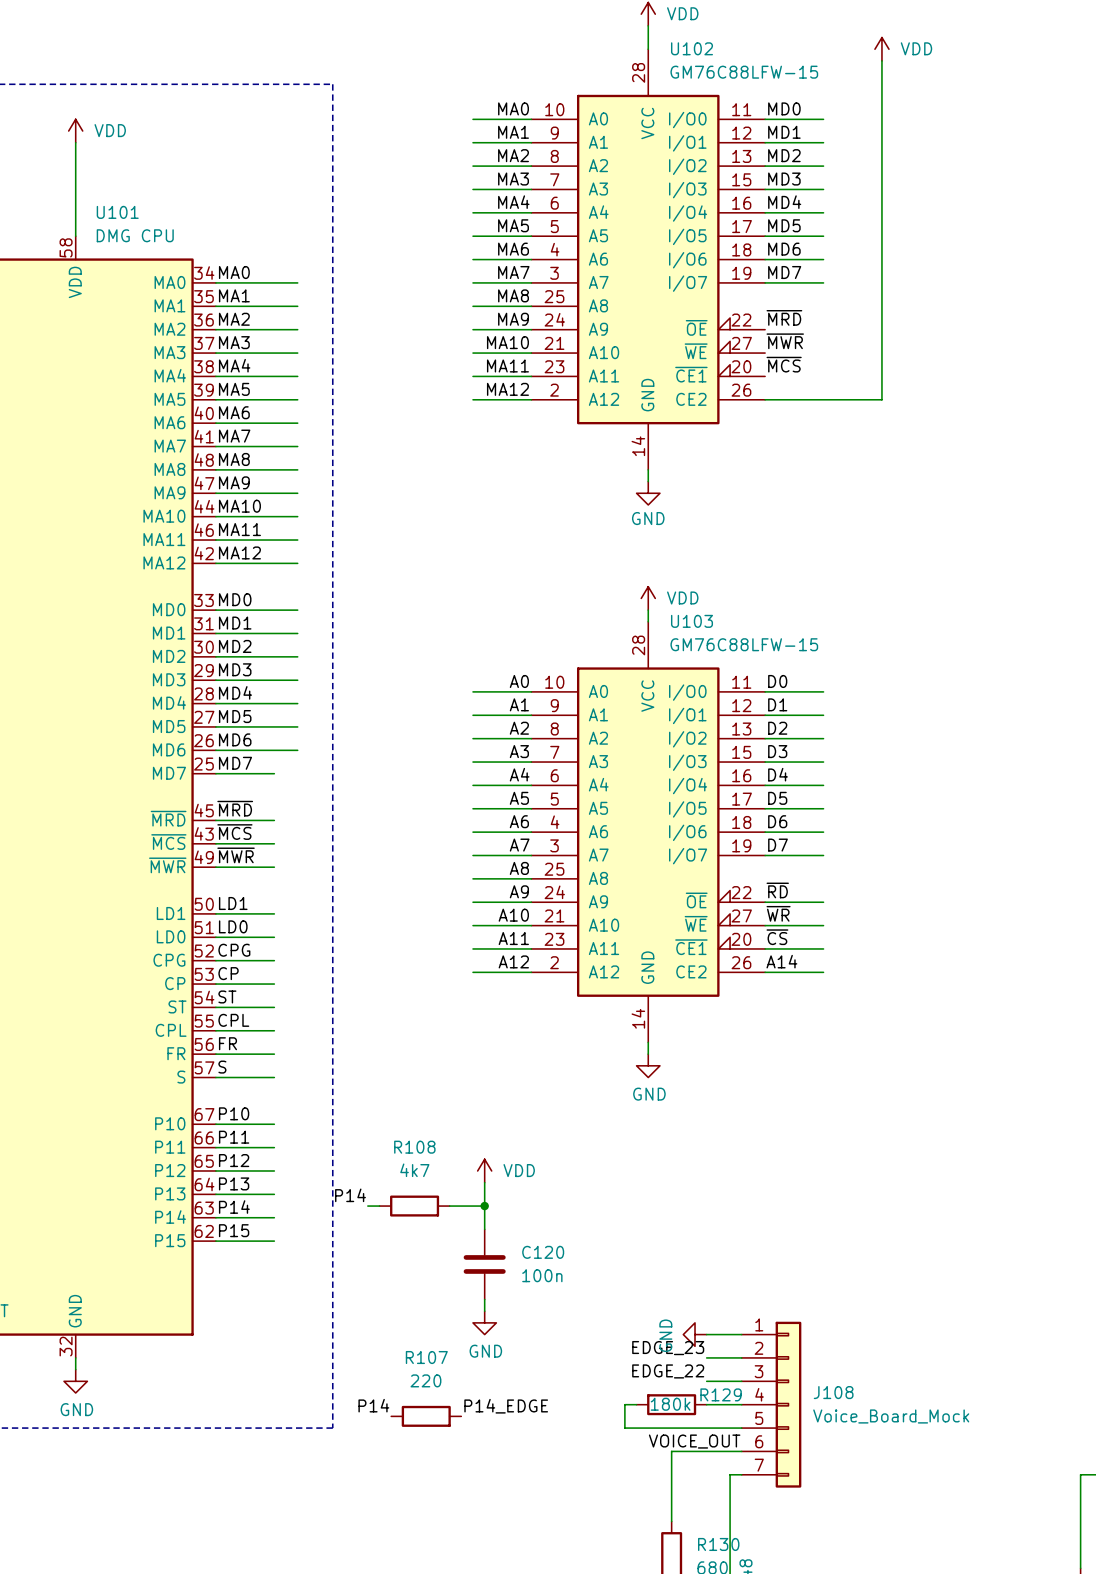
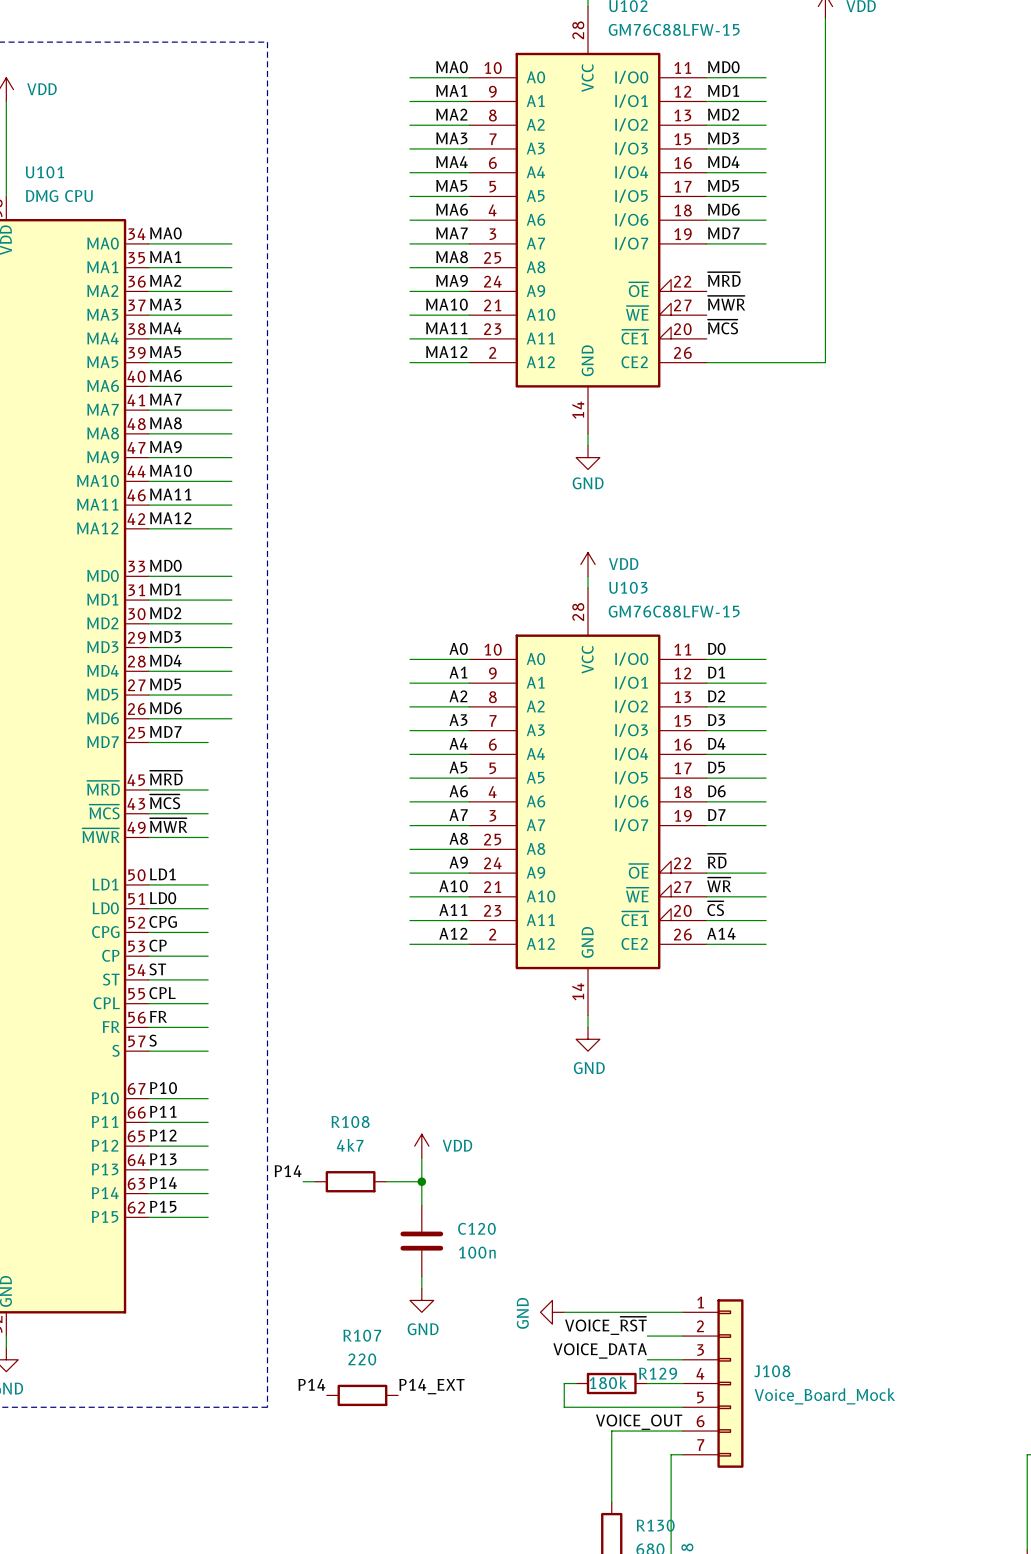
wire: none -> (564, 1312) (647, 1312)
power symbol position: GND (695, 1334) -> GND (552, 1312)
label: EDGE_23 (668, 1348) -> VOICE_~{RST} (605, 1325)
label: EDGE_22 (668, 1371) -> VOICE_DATA (600, 1350)
label: P14_EDGE (506, 1406) -> P14_EXT (431, 1386)

